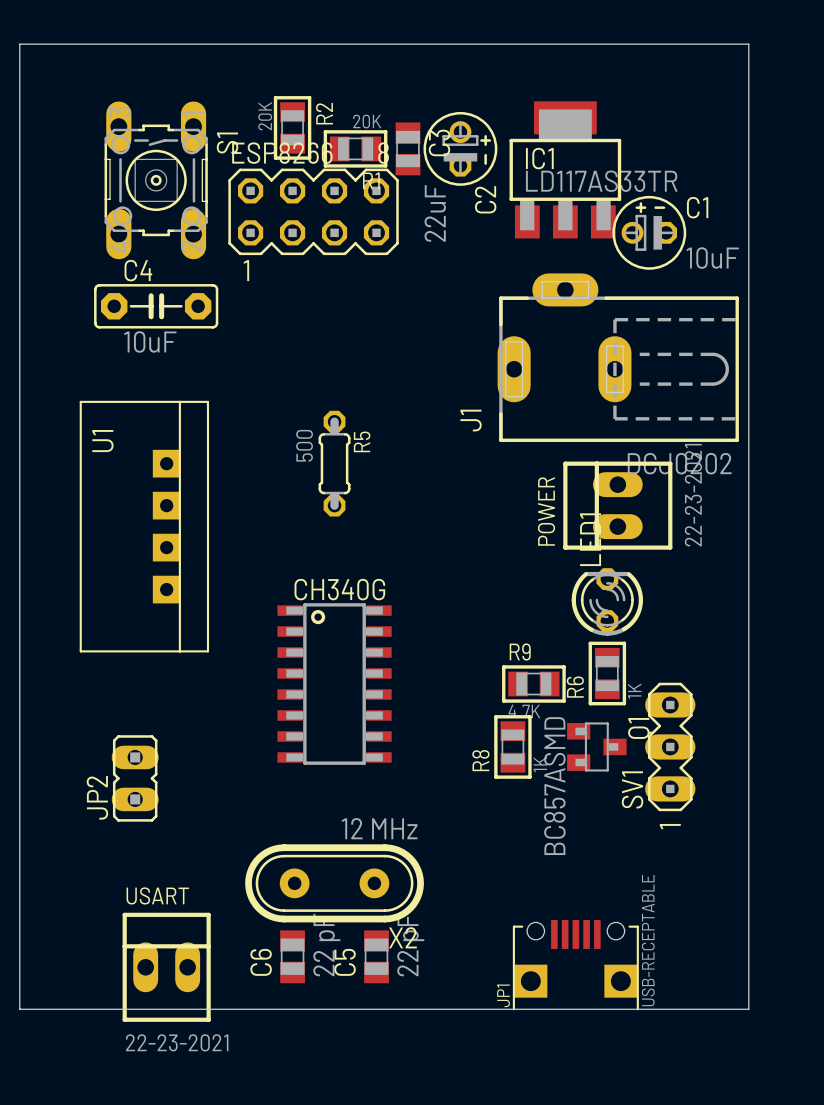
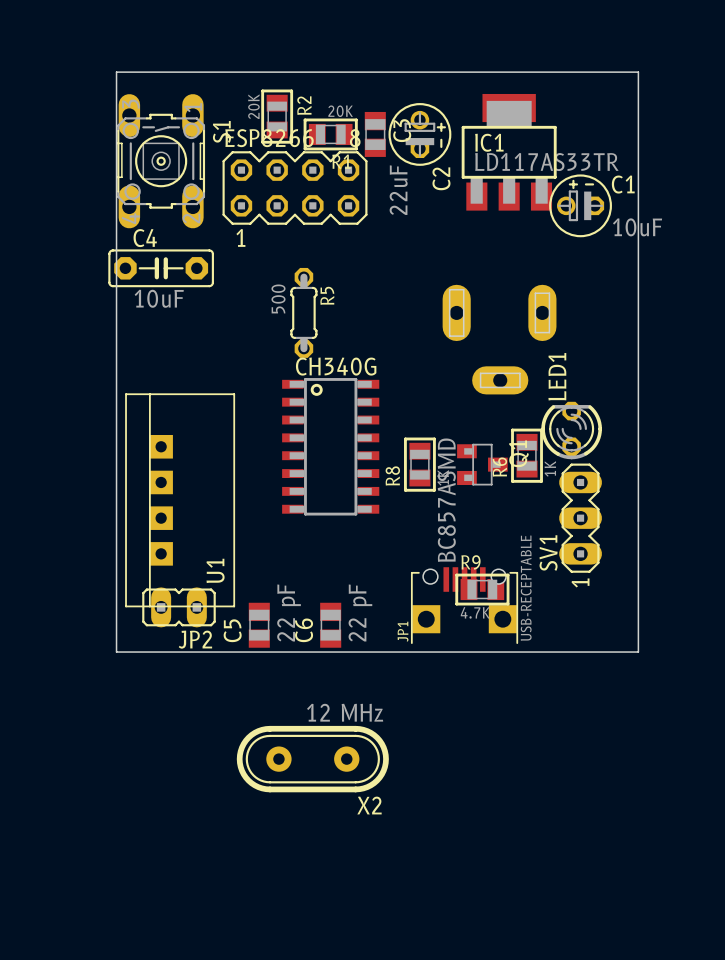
board edge: (19, 44) (748, 44) (748, 1009) (19, 1009) (19, 44) -> (116, 72) (116, 652) (638, 652) (638, 72) (116, 72)
J1 side: top (618, 357) -> bottom (499, 339)
R5 position: (334, 463) -> (303, 312)
POWER: 22-23-2021 (617, 505) -> none
U1 rotation: 0° (144, 526) -> 180° (180, 500)
LED1 position: (607, 601) -> (571, 430)
R6 position: (607, 673) -> (527, 455)
part position: (334, 684) -> (330, 446)
R8 position: (512, 746) -> (419, 464)
Q1 position: (596, 746) -> (482, 464)
SV1 position: (670, 746) -> (580, 518)
JP2 rotation: 0° (135, 778) -> 90° clockwise (178, 607)
JP2 position: (135, 778) -> (178, 607)
JP2 name position: JP2 (97, 797) -> JP2 (195, 639)
C6 position: (292, 956) -> (330, 625)
C5 position: (376, 956) -> (259, 625)
JP1 position: (575, 965) -> (464, 605)
USART: 22-23-2021 (166, 967) -> none

